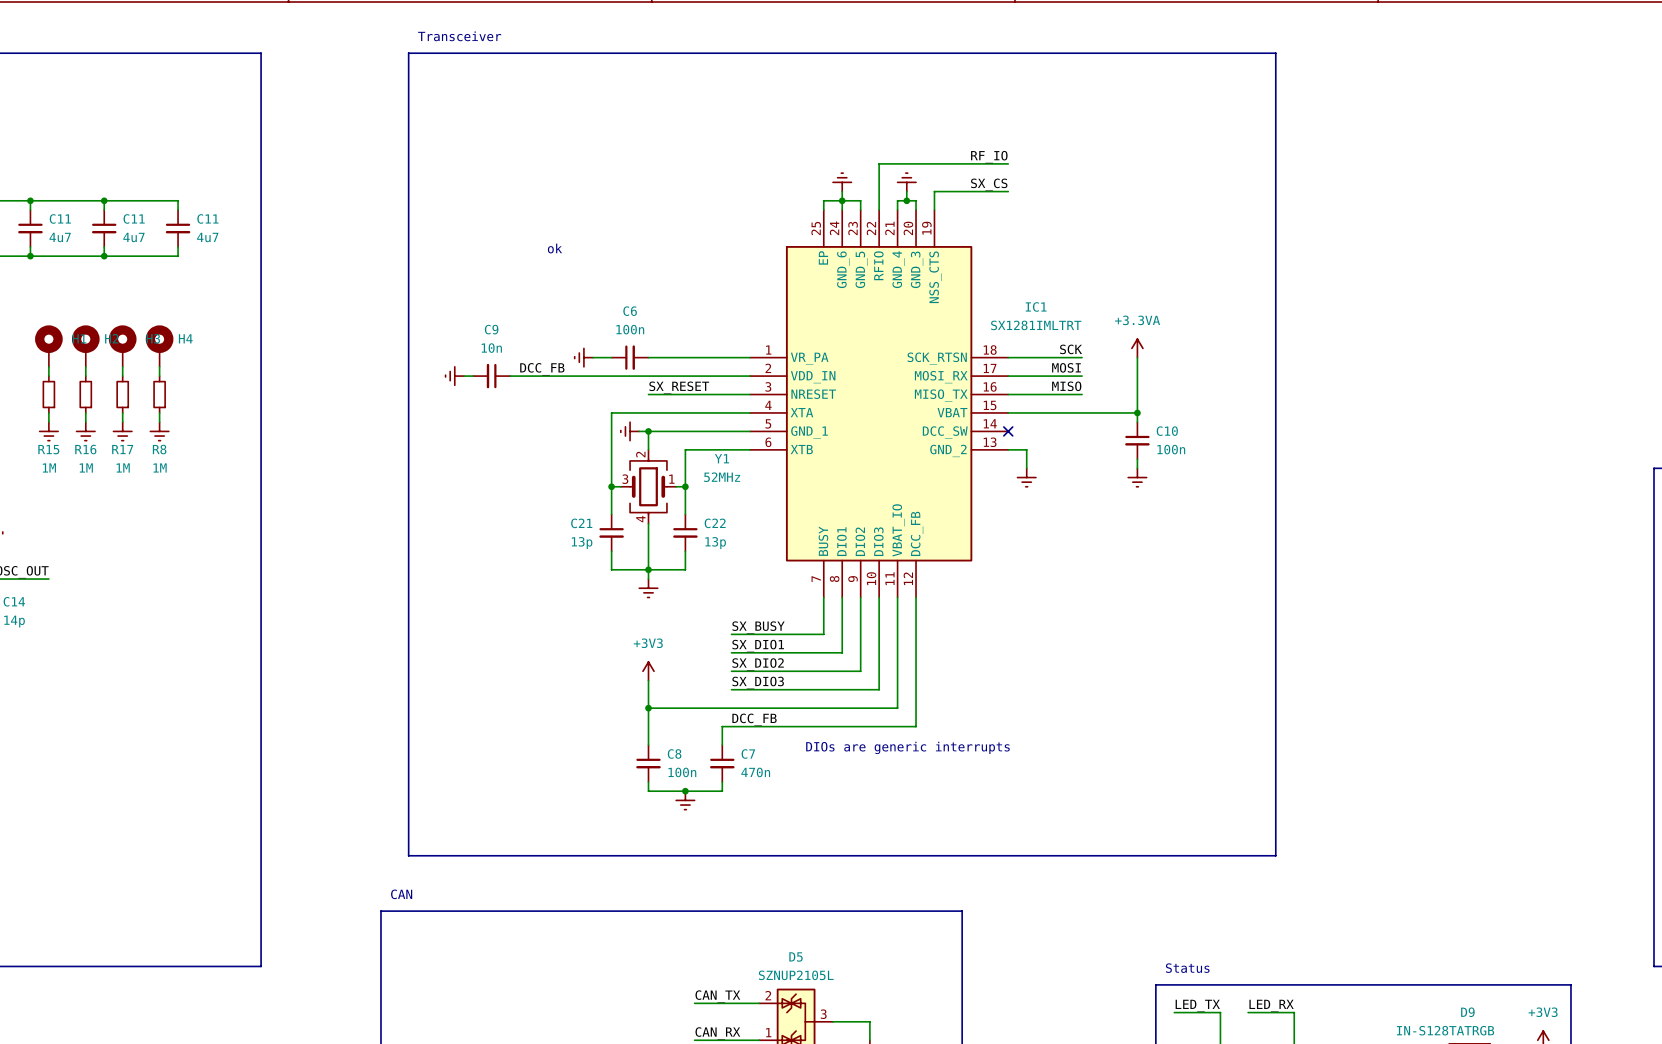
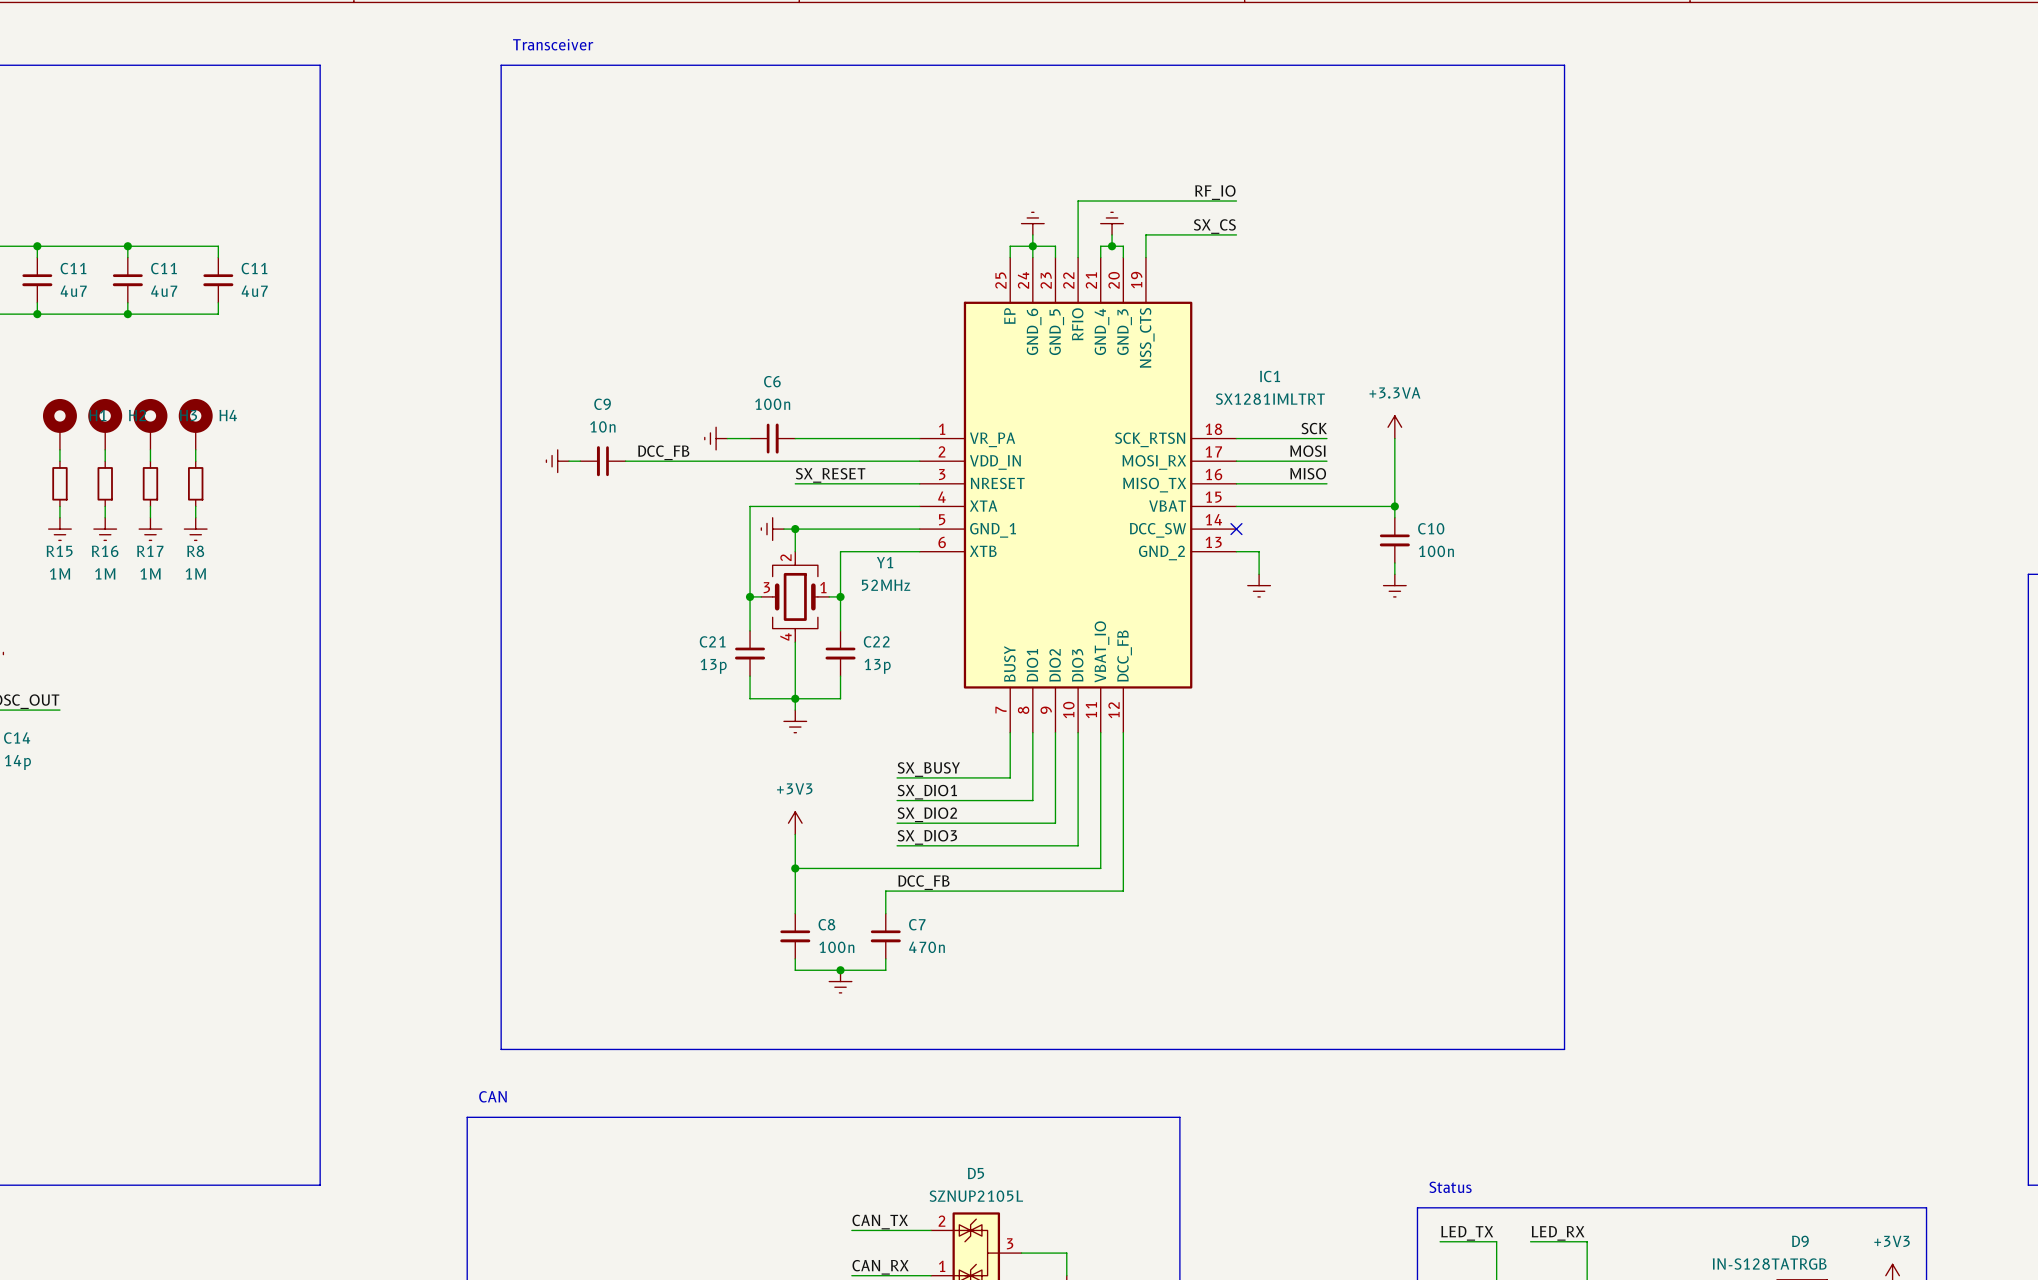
text: ok (554, 248) -> none
text: DIOs are generic interrupts (907, 747) -> none

